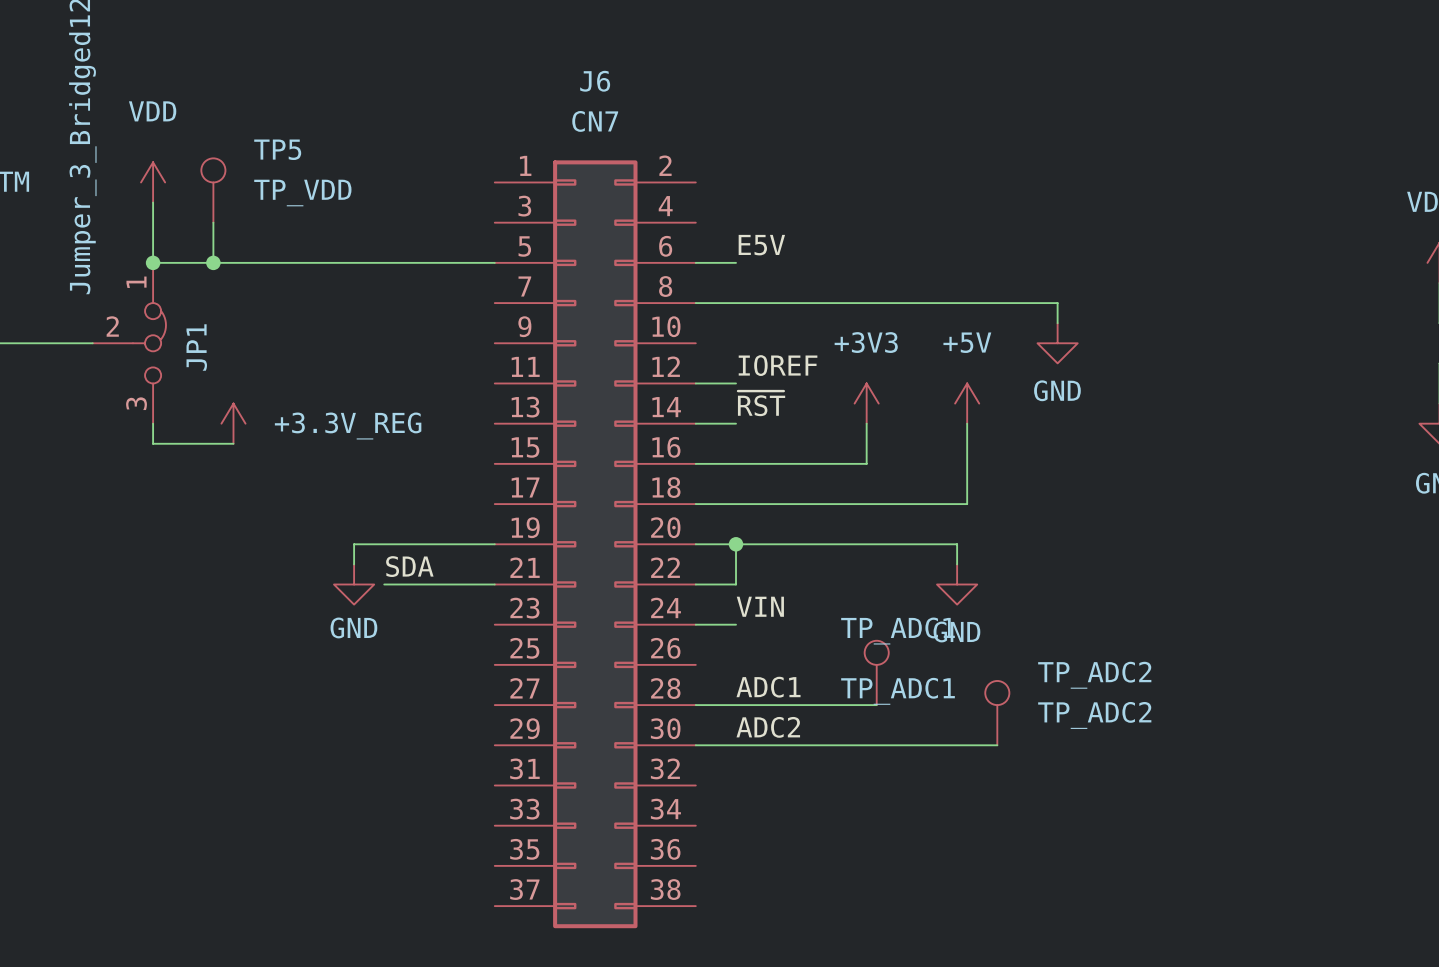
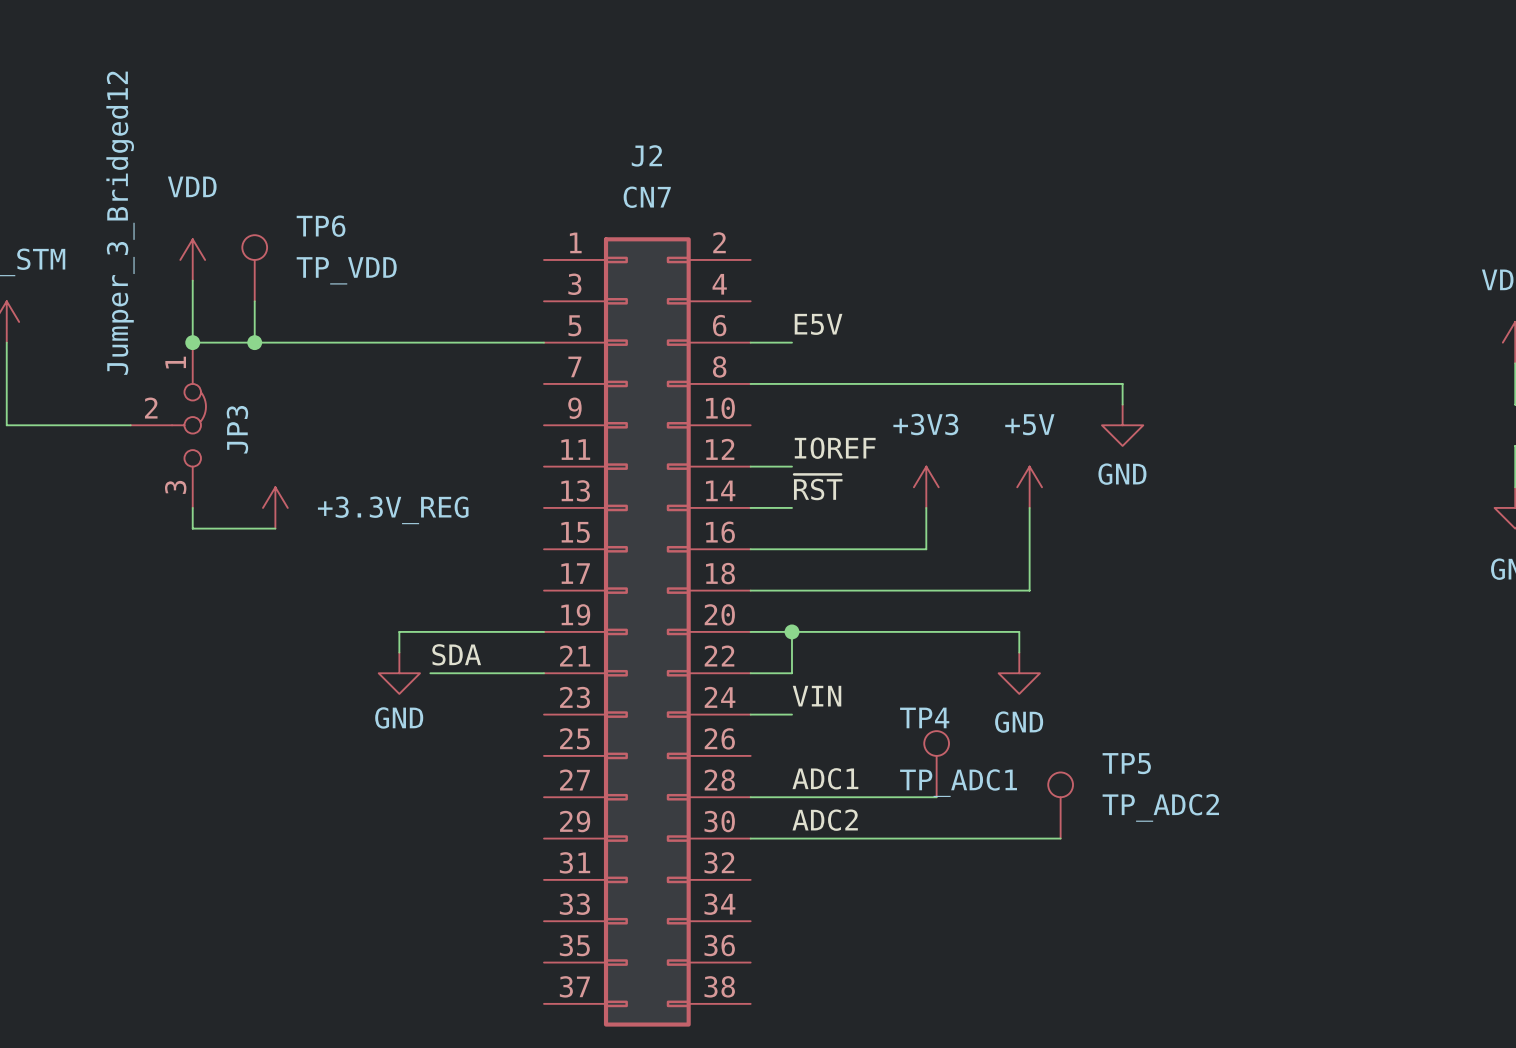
J6 name: J6 (595, 81) -> J2 (646, 155)
TP5 name: TP5 (277, 149) -> TP6 (321, 226)
JP1 name: JP1 (196, 347) -> JP3 (237, 429)
TP_ADC1 name: TP_ADC1 (898, 631) -> TP4 (924, 717)
TP_ADC2 name: TP_ADC2 (1094, 675) -> TP5 (1126, 763)

